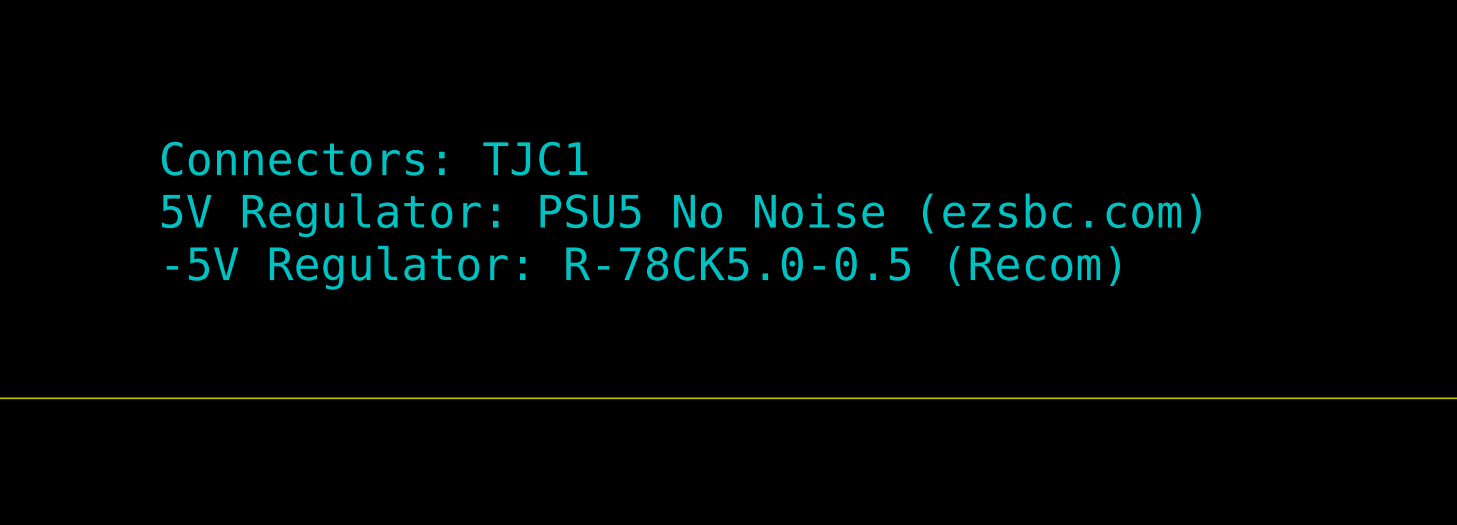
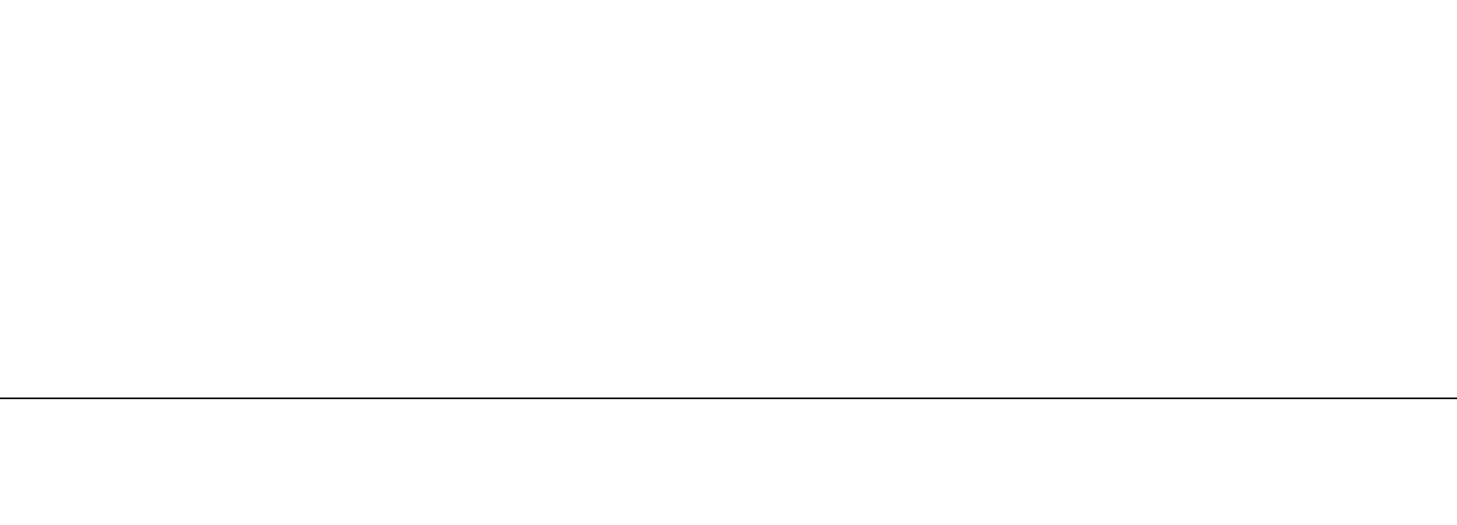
text: Connectors: TJC1 (374, 158) -> none
text: 5V Regulator: PSU5 No Noise (ezsbc.com) (681, 215) -> none
text: -5V Regulator: R-78CK5.0-0.5 (Recom) (643, 267) -> none

